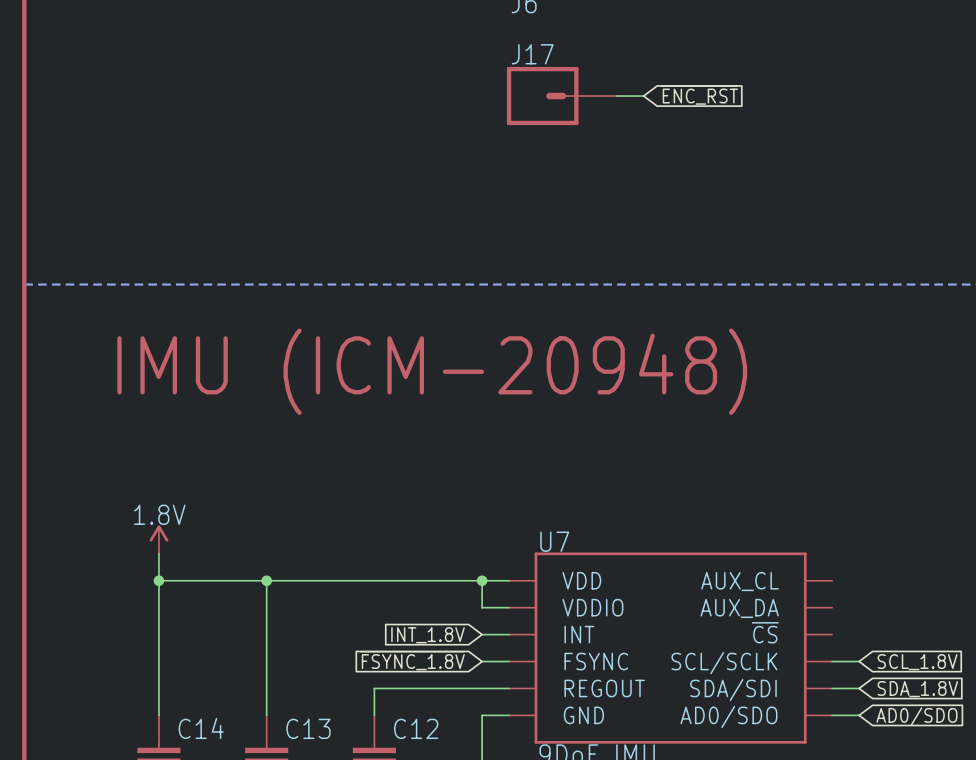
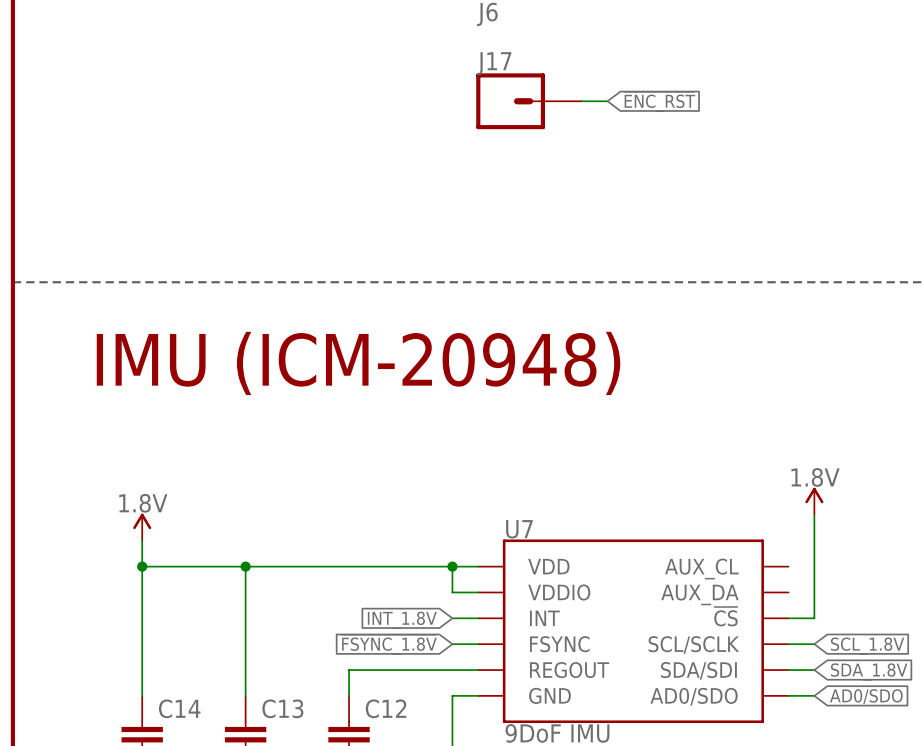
power symbol: none -> 1.8V (814, 501)
wire: none -> (814, 514) (814, 618) (788, 618)

